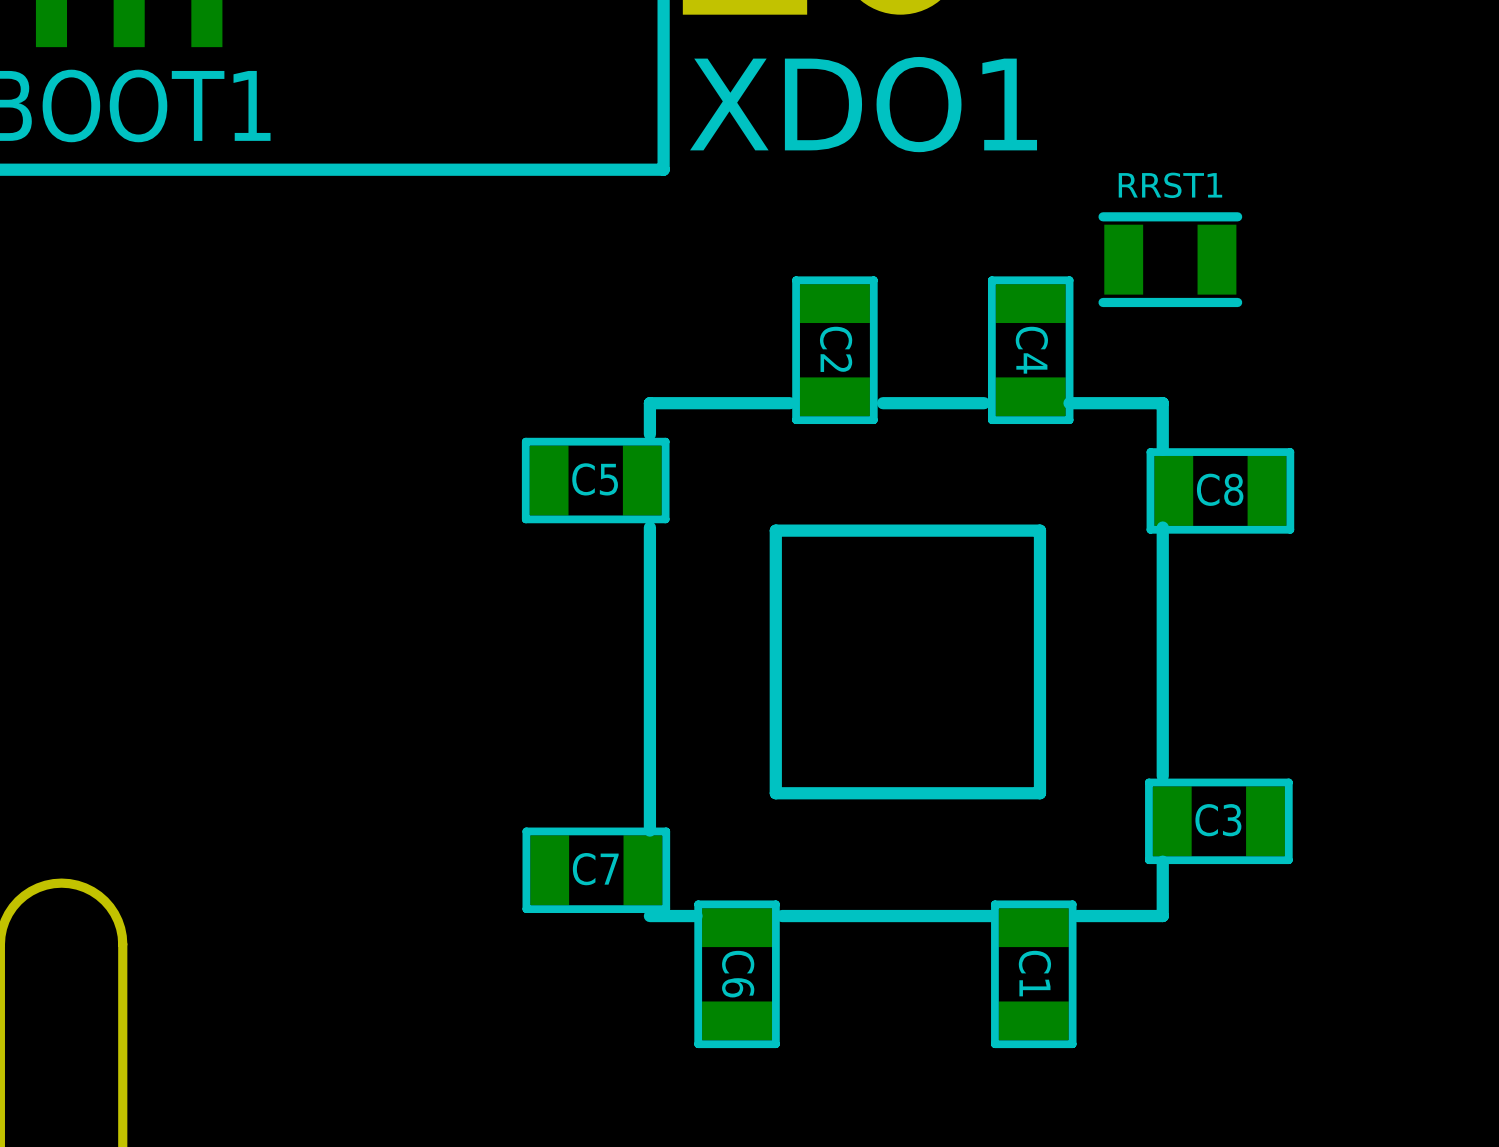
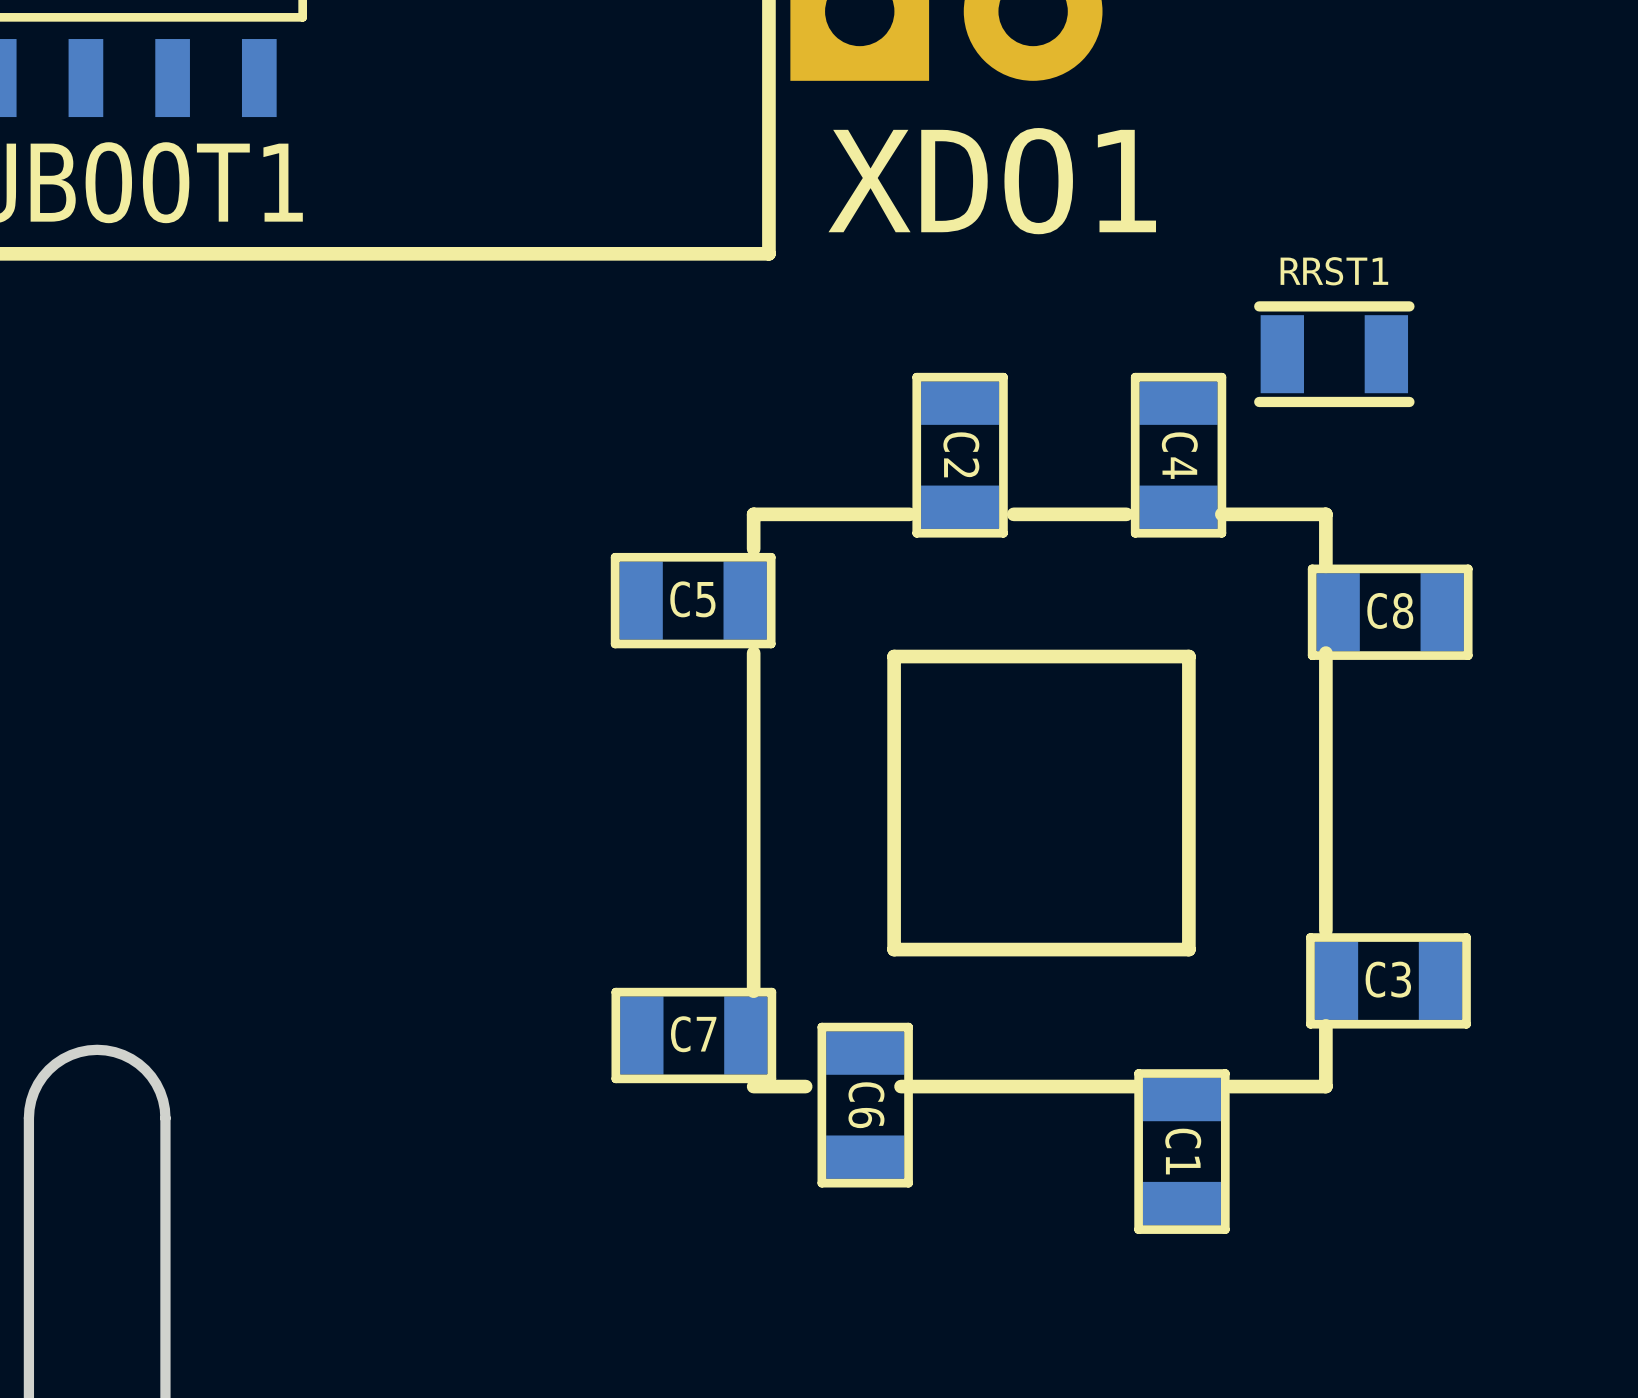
C6 position: (737, 974) -> (865, 1105)

